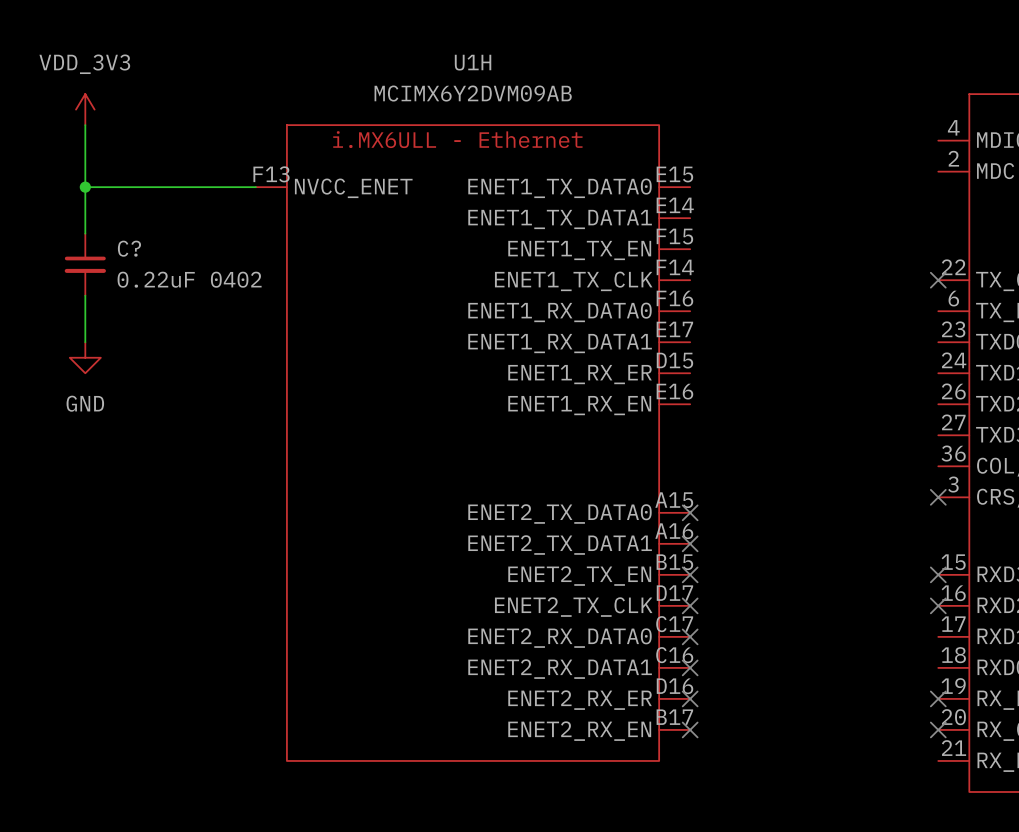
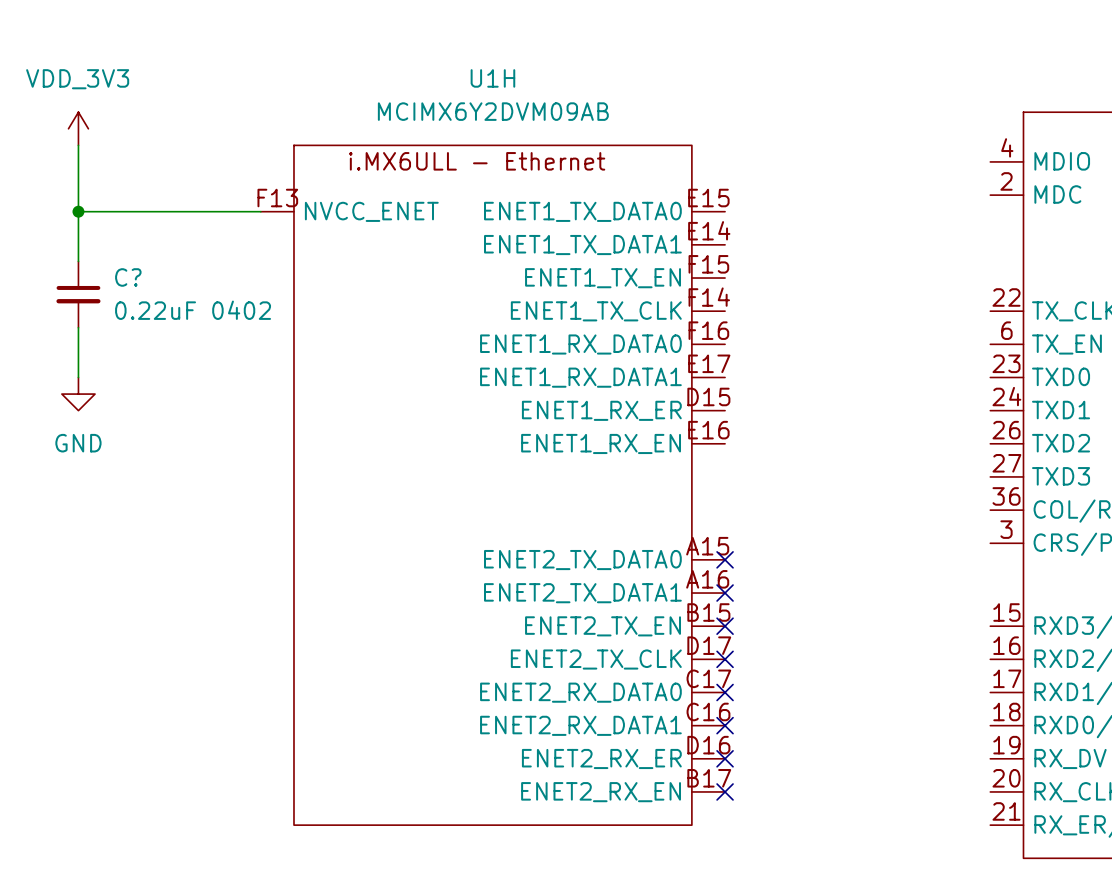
no-connect mark: (938, 280) -> none
no-connect mark: (938, 497) -> none
no-connect mark: (938, 574) -> none
no-connect mark: (938, 605) -> none
no-connect mark: (938, 698) -> none
no-connect mark: (938, 729) -> none

